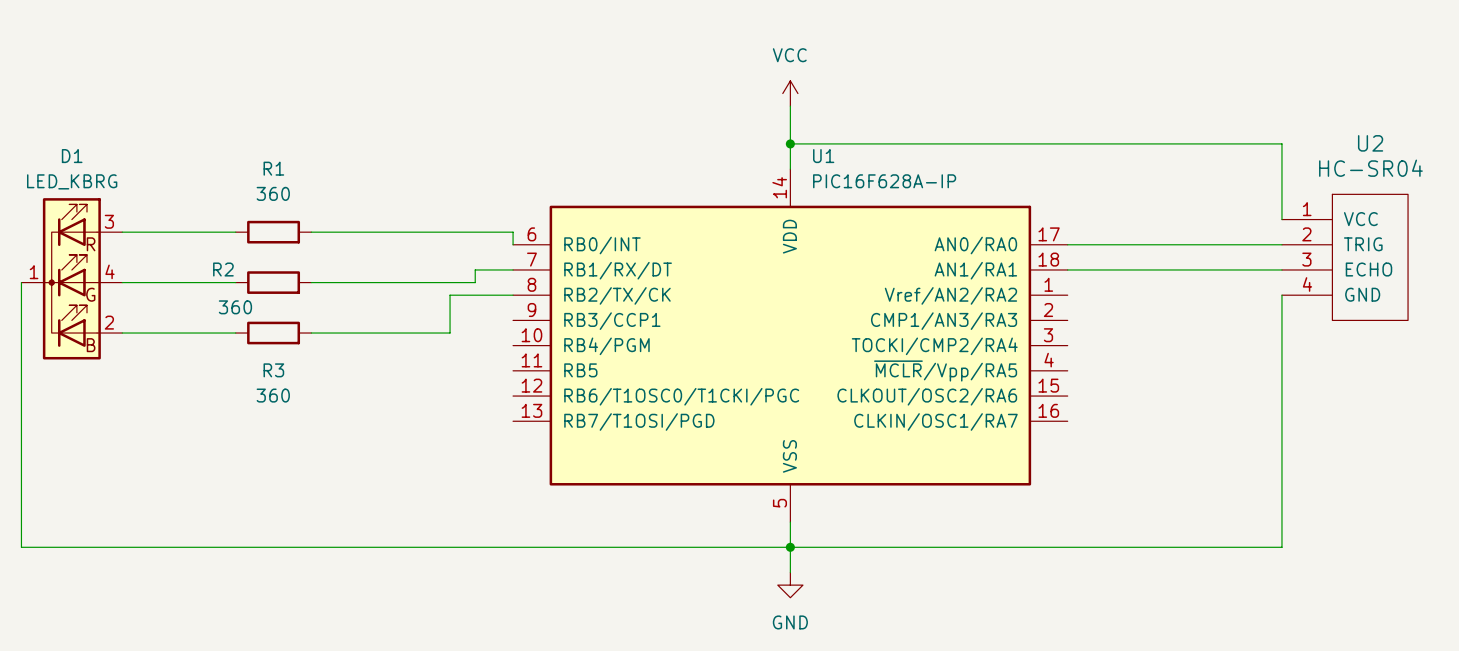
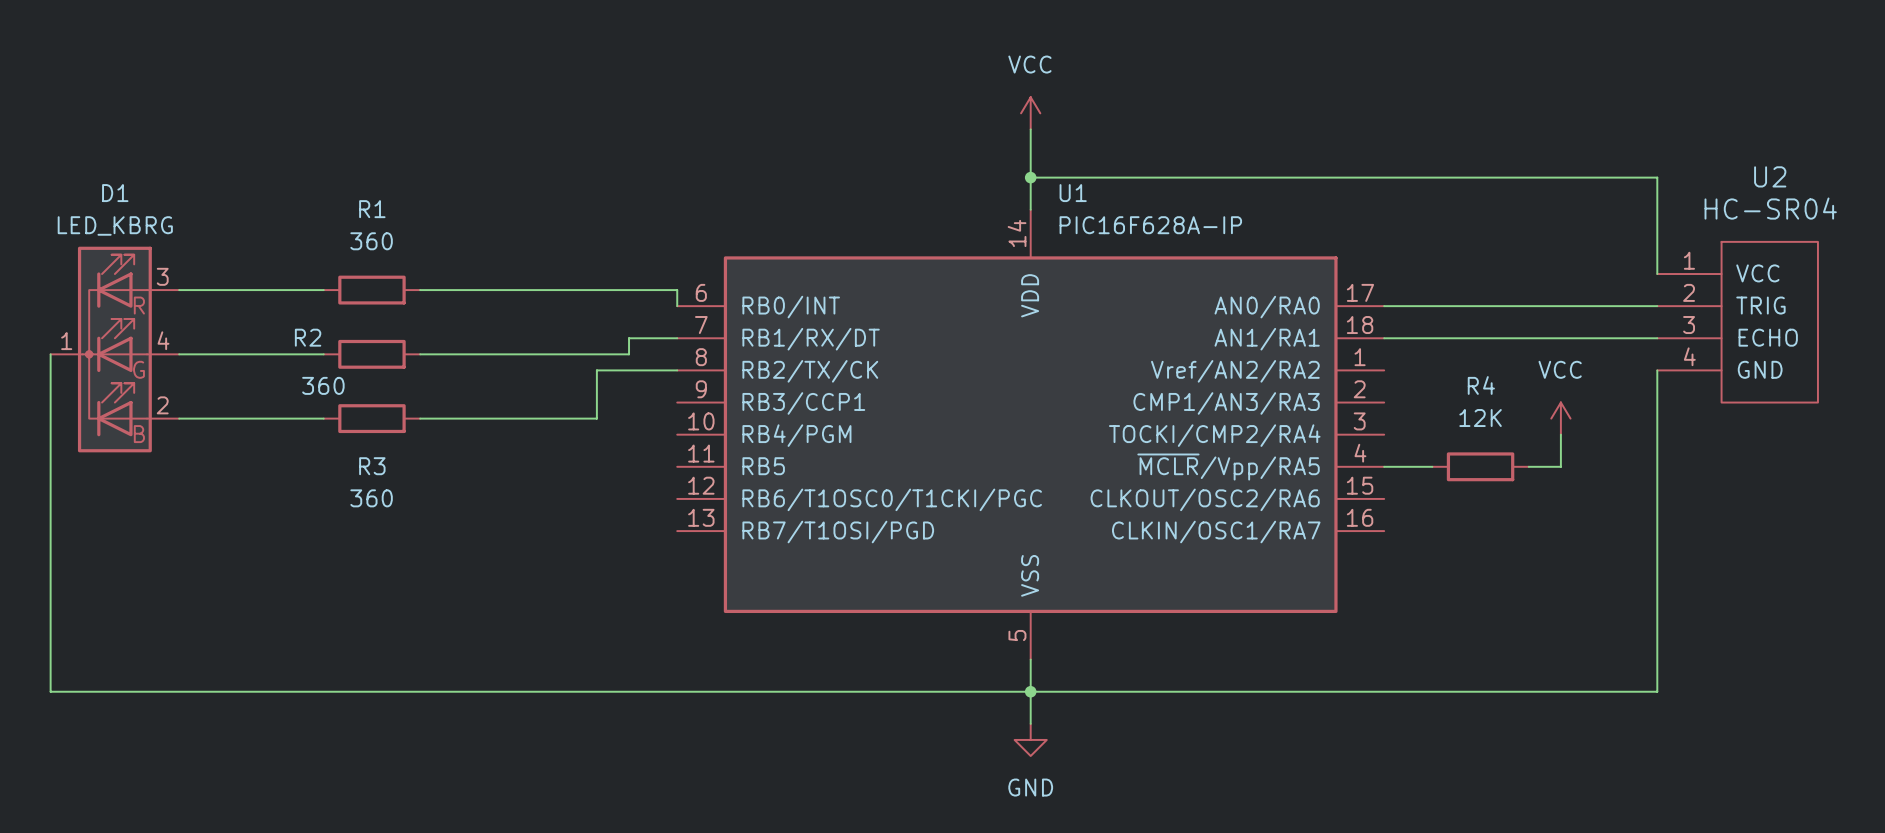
power symbol: none -> VCC (1560, 418)
wire: none -> (1560, 434) (1560, 466) (1528, 466)
wire: none -> (1384, 466) (1432, 466)
R4: none -> 12K (1480, 466)

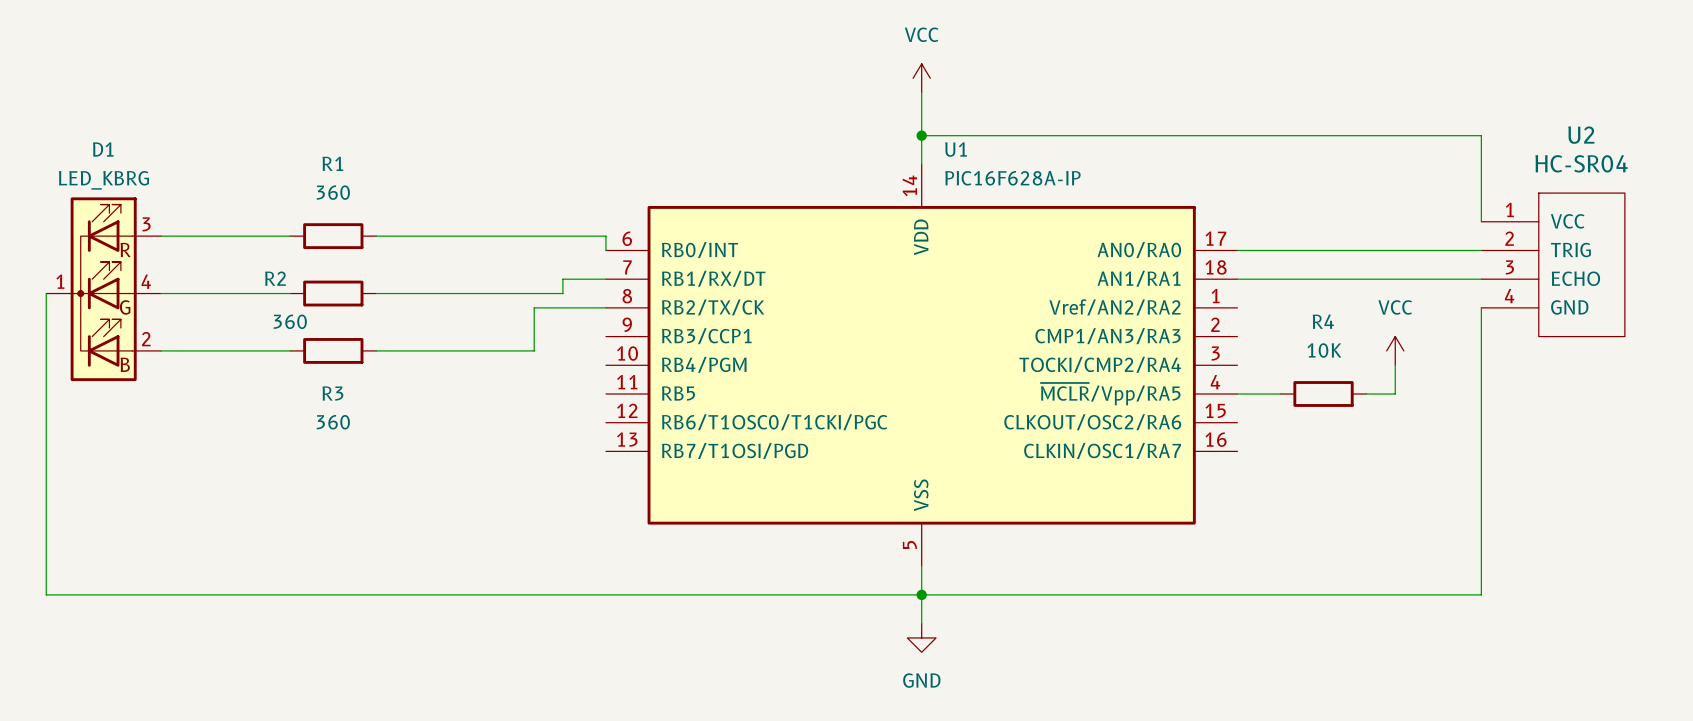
R4 value: 12K (1480, 418) -> 10K (1324, 350)

